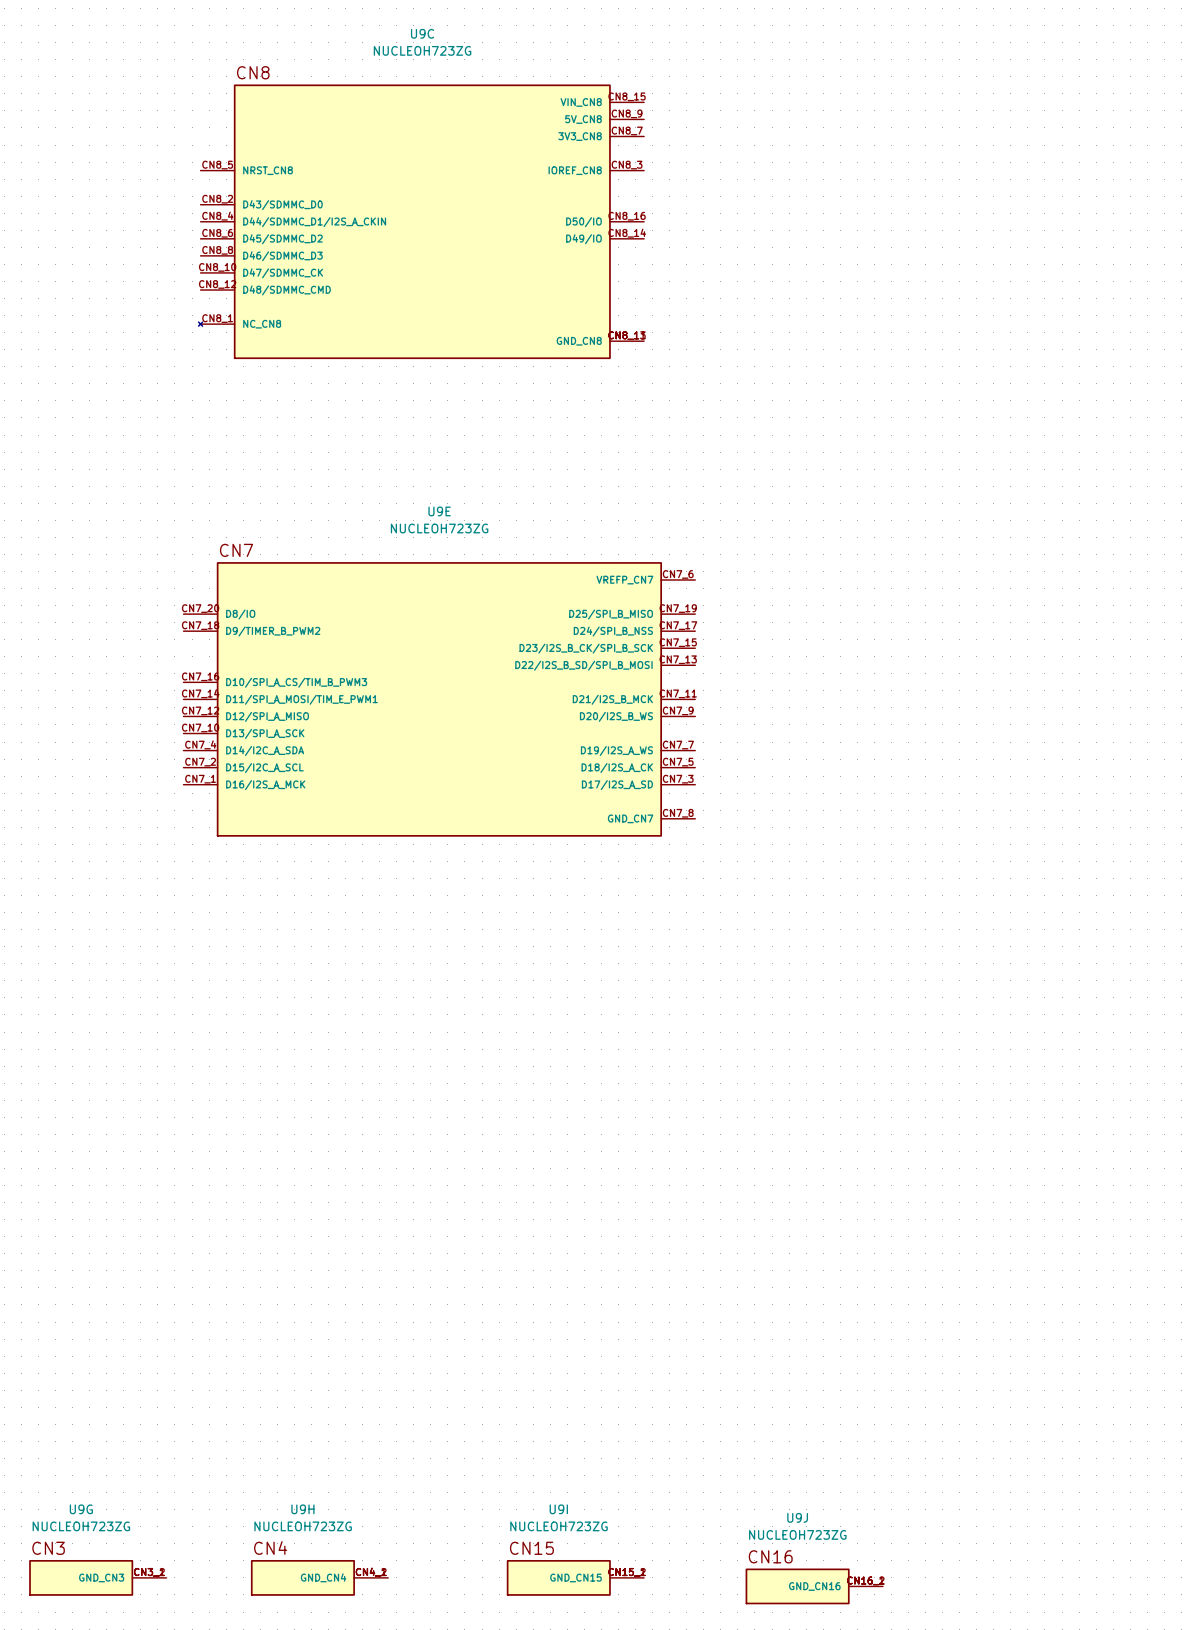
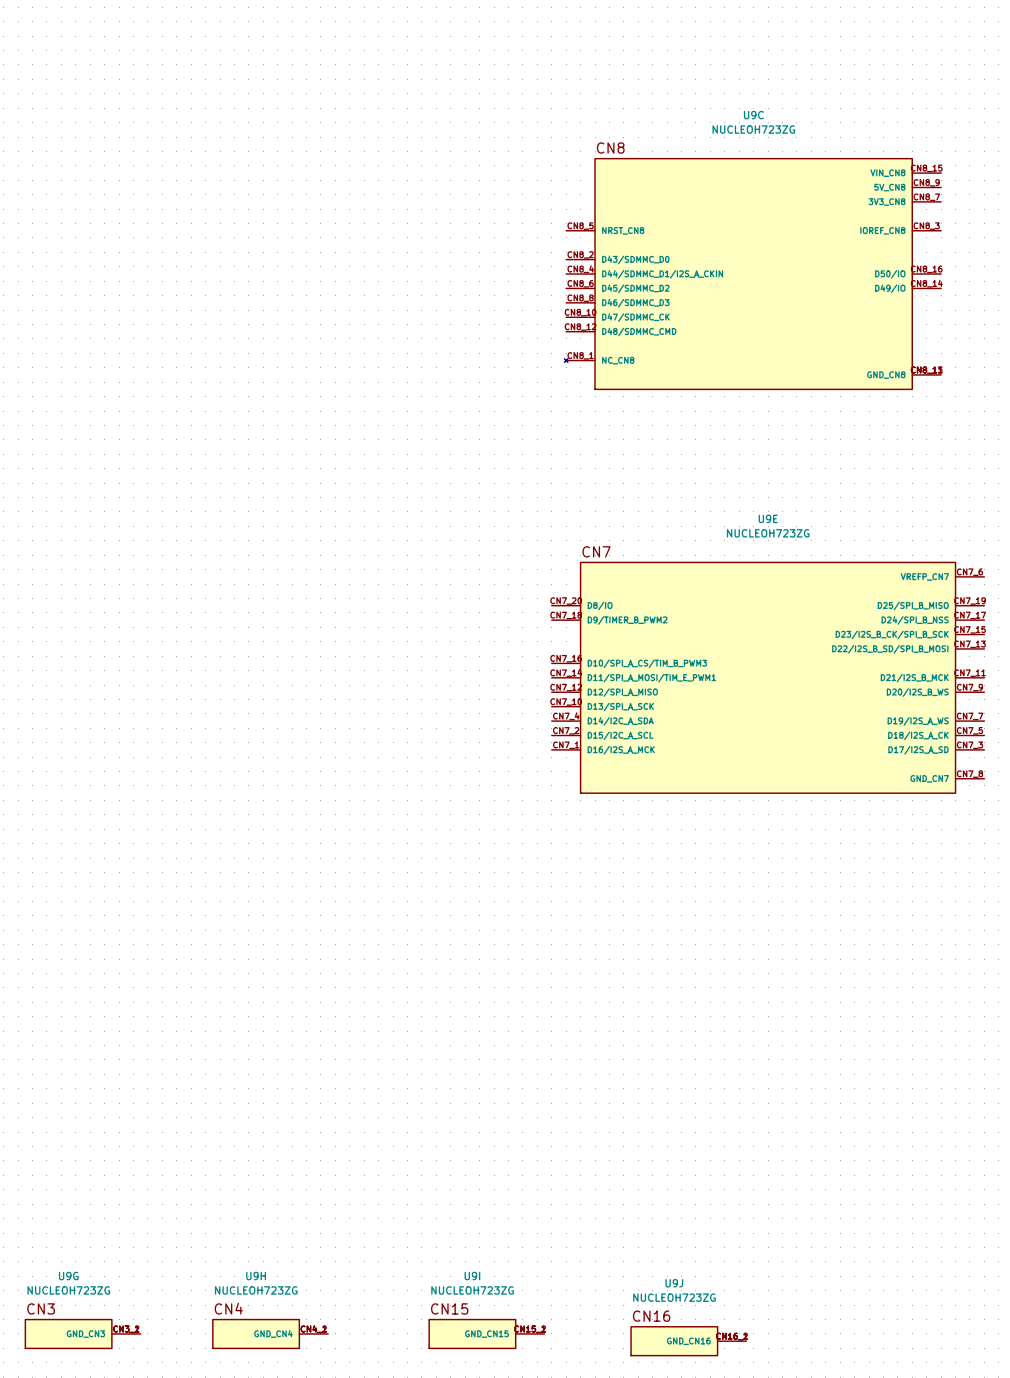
U9C position: (421, 221) -> (752, 274)
U9E position: (439, 699) -> (768, 677)

